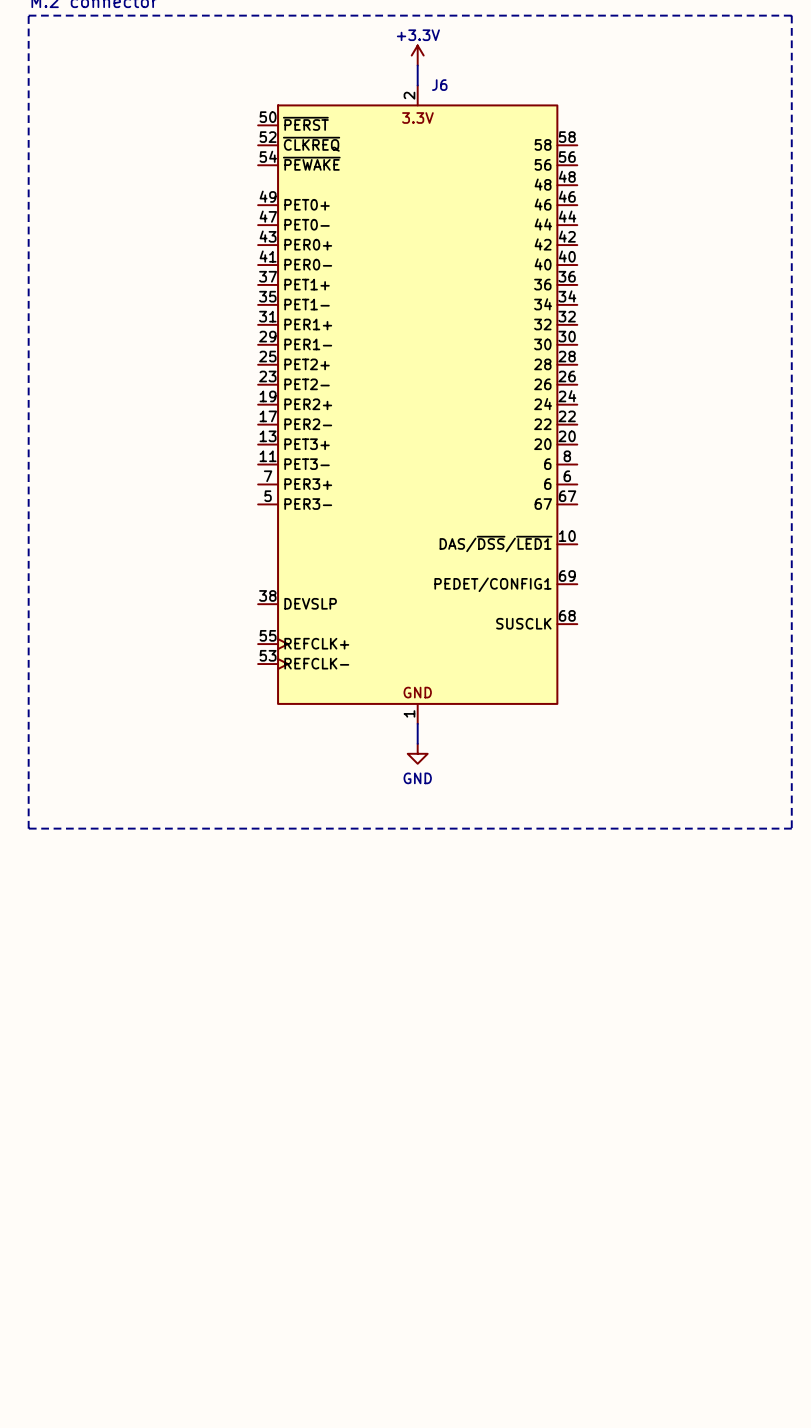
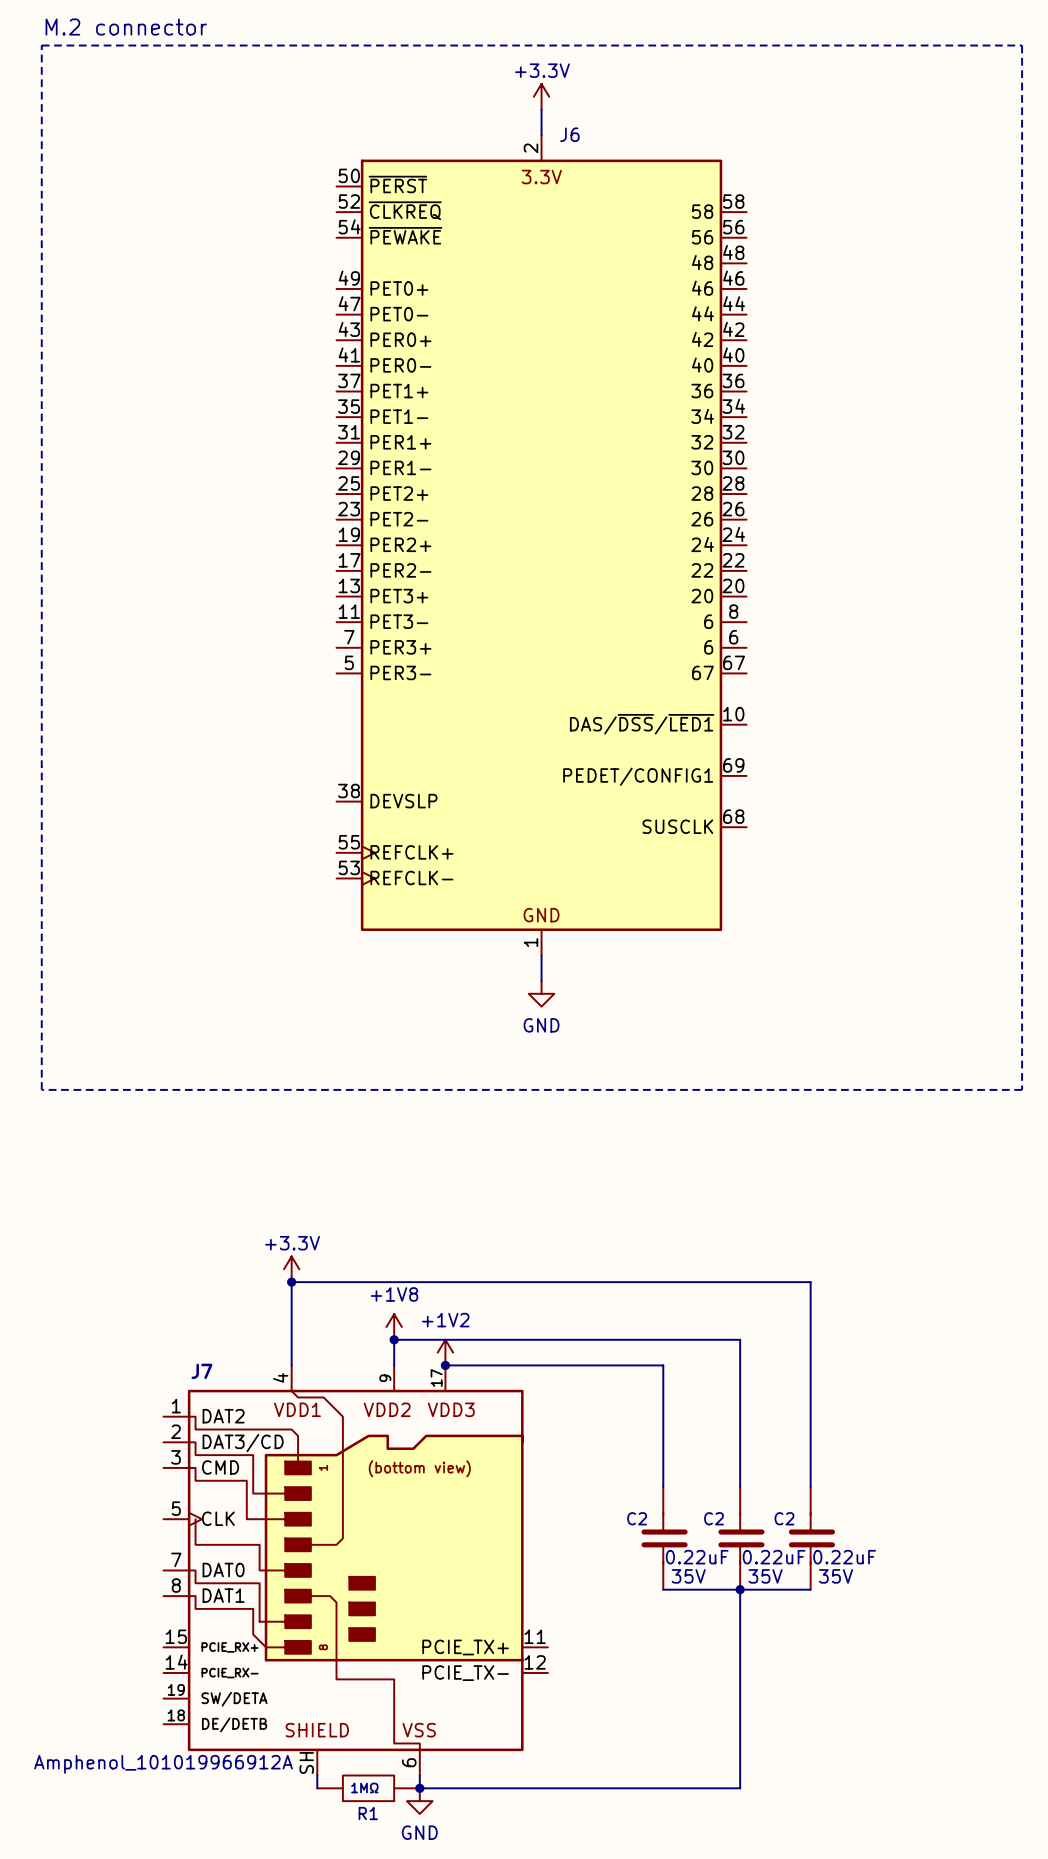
power symbol: none -> +3.3V (291, 1269)
junction: none -> (291, 1282)
power symbol: none -> +1V8 (394, 1326)
junction: none -> (394, 1339)
power symbol: none -> +1V2 (445, 1352)
wire: none -> (291, 1365) (291, 1282) (810, 1282) (810, 1487)
wire: none -> (394, 1365) (394, 1339) (740, 1339) (740, 1487)
wire: none -> (445, 1365) (663, 1365) (663, 1487)
junction: none -> (445, 1365)
C2: none -> (664, 1538)
C2: none -> (741, 1538)
C2: none -> (811, 1538)
J7: none -> Amphenol_101019966912A (355, 1570)
wire: none -> (663, 1589) (810, 1589)
wire: none -> (740, 1589) (740, 1788) (419, 1788) (419, 1775)
junction: none -> (740, 1589)
wire: none -> (317, 1775) (317, 1788)
R1: none -> (368, 1788)
junction: none -> (419, 1788)
power symbol: none -> GND (419, 1801)

